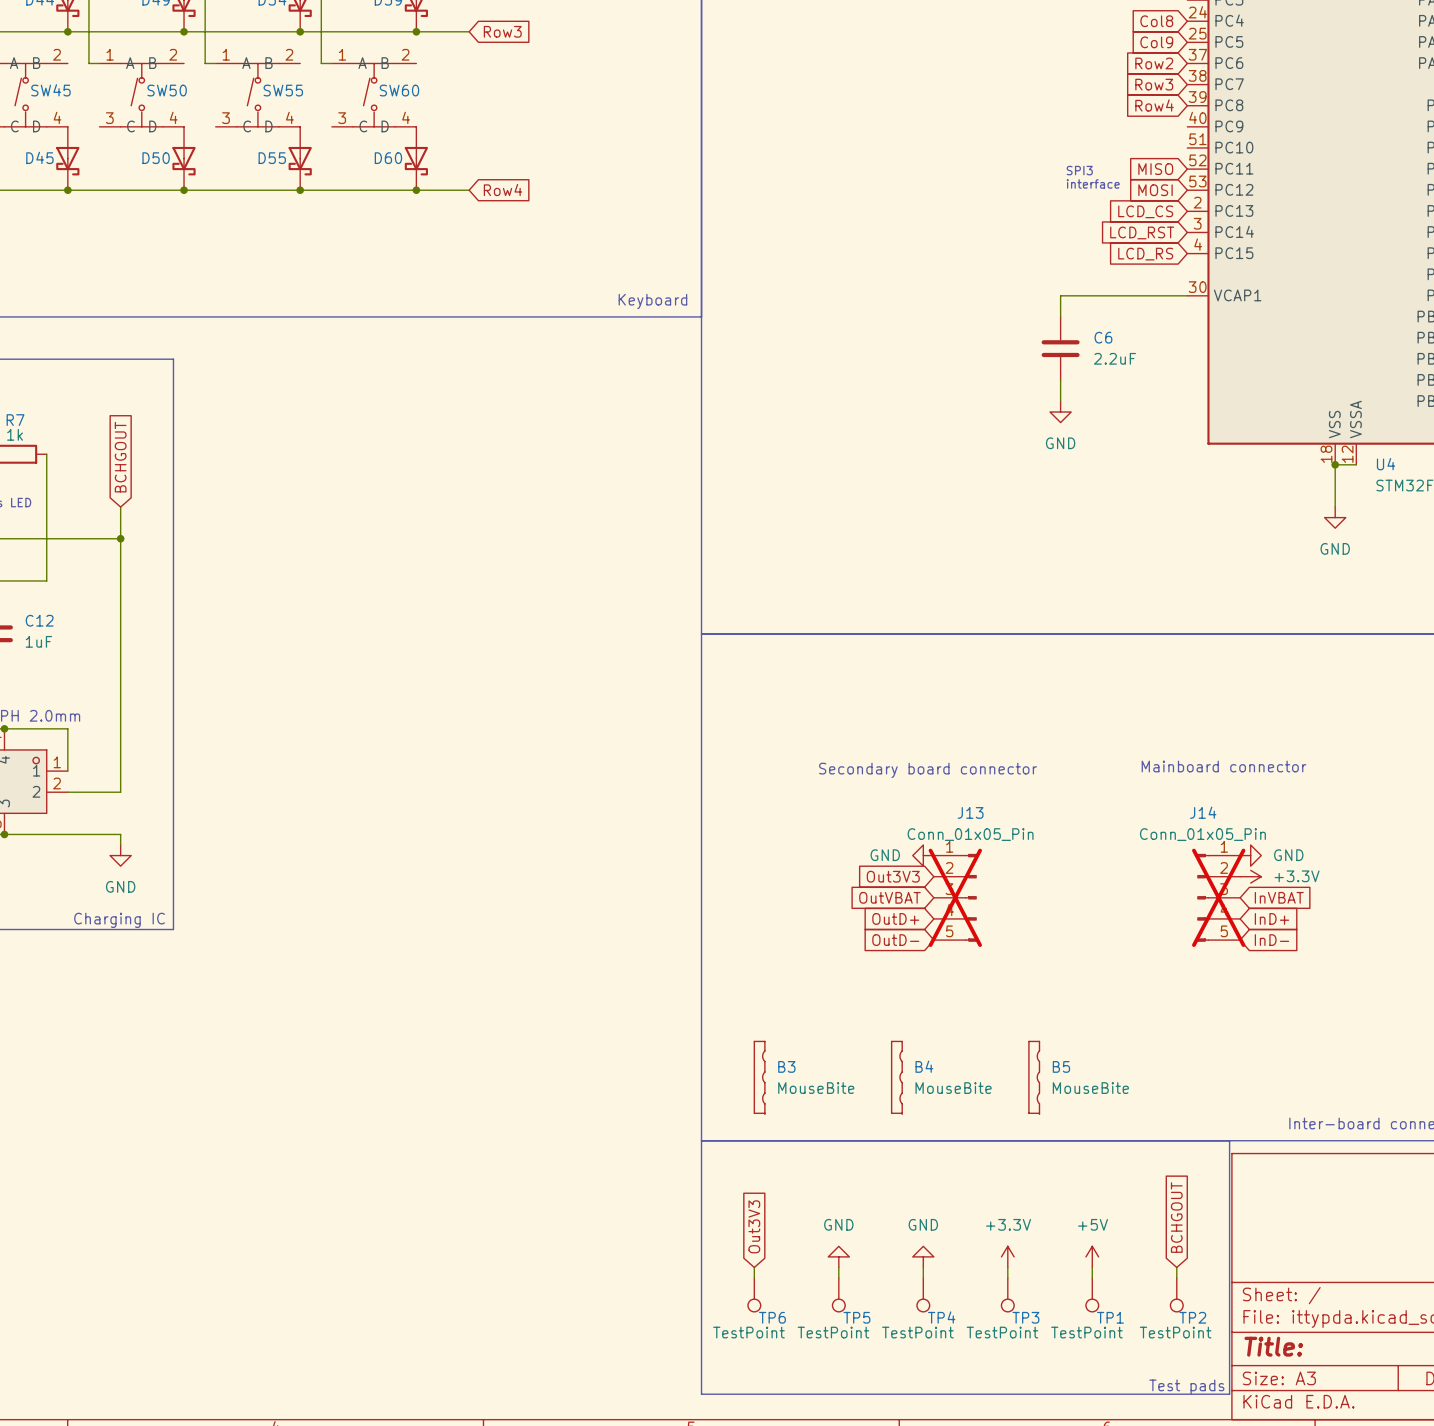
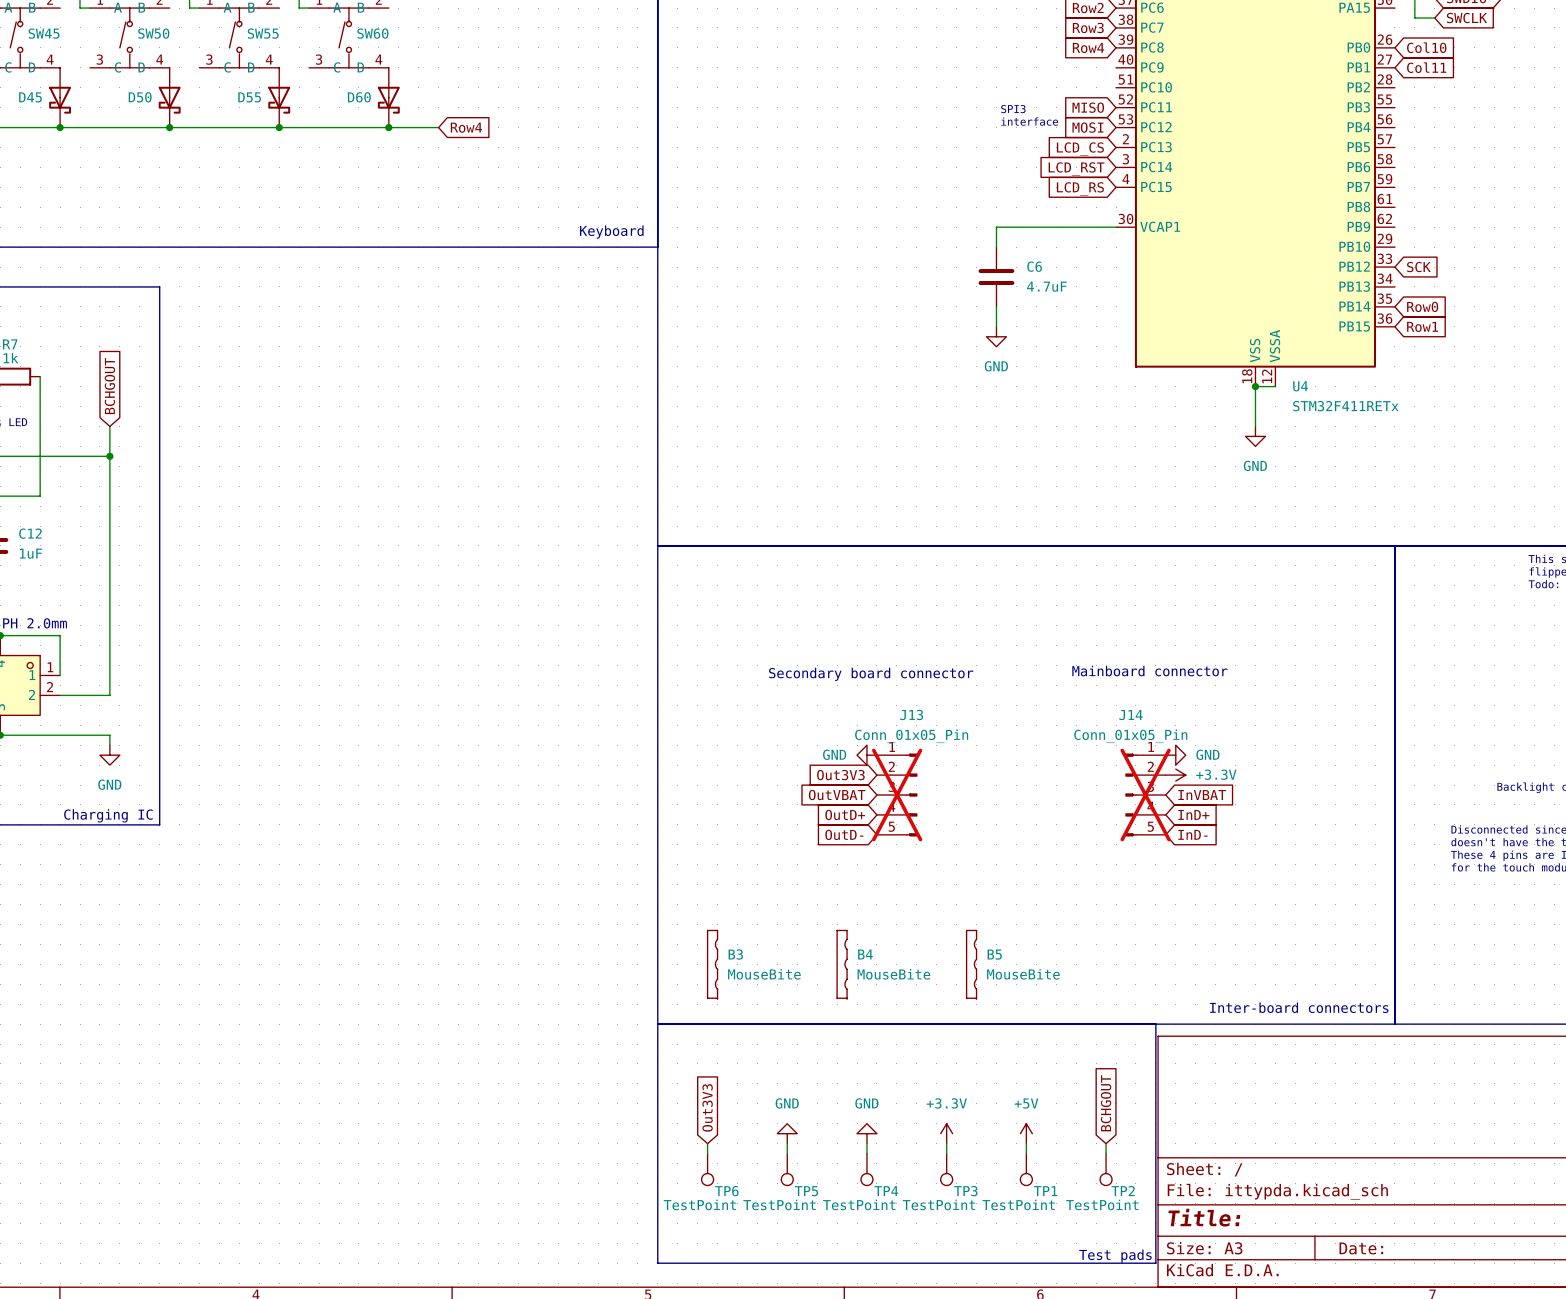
C6 value: 2.2uF (1115, 358) -> 4.7uF (1046, 286)

